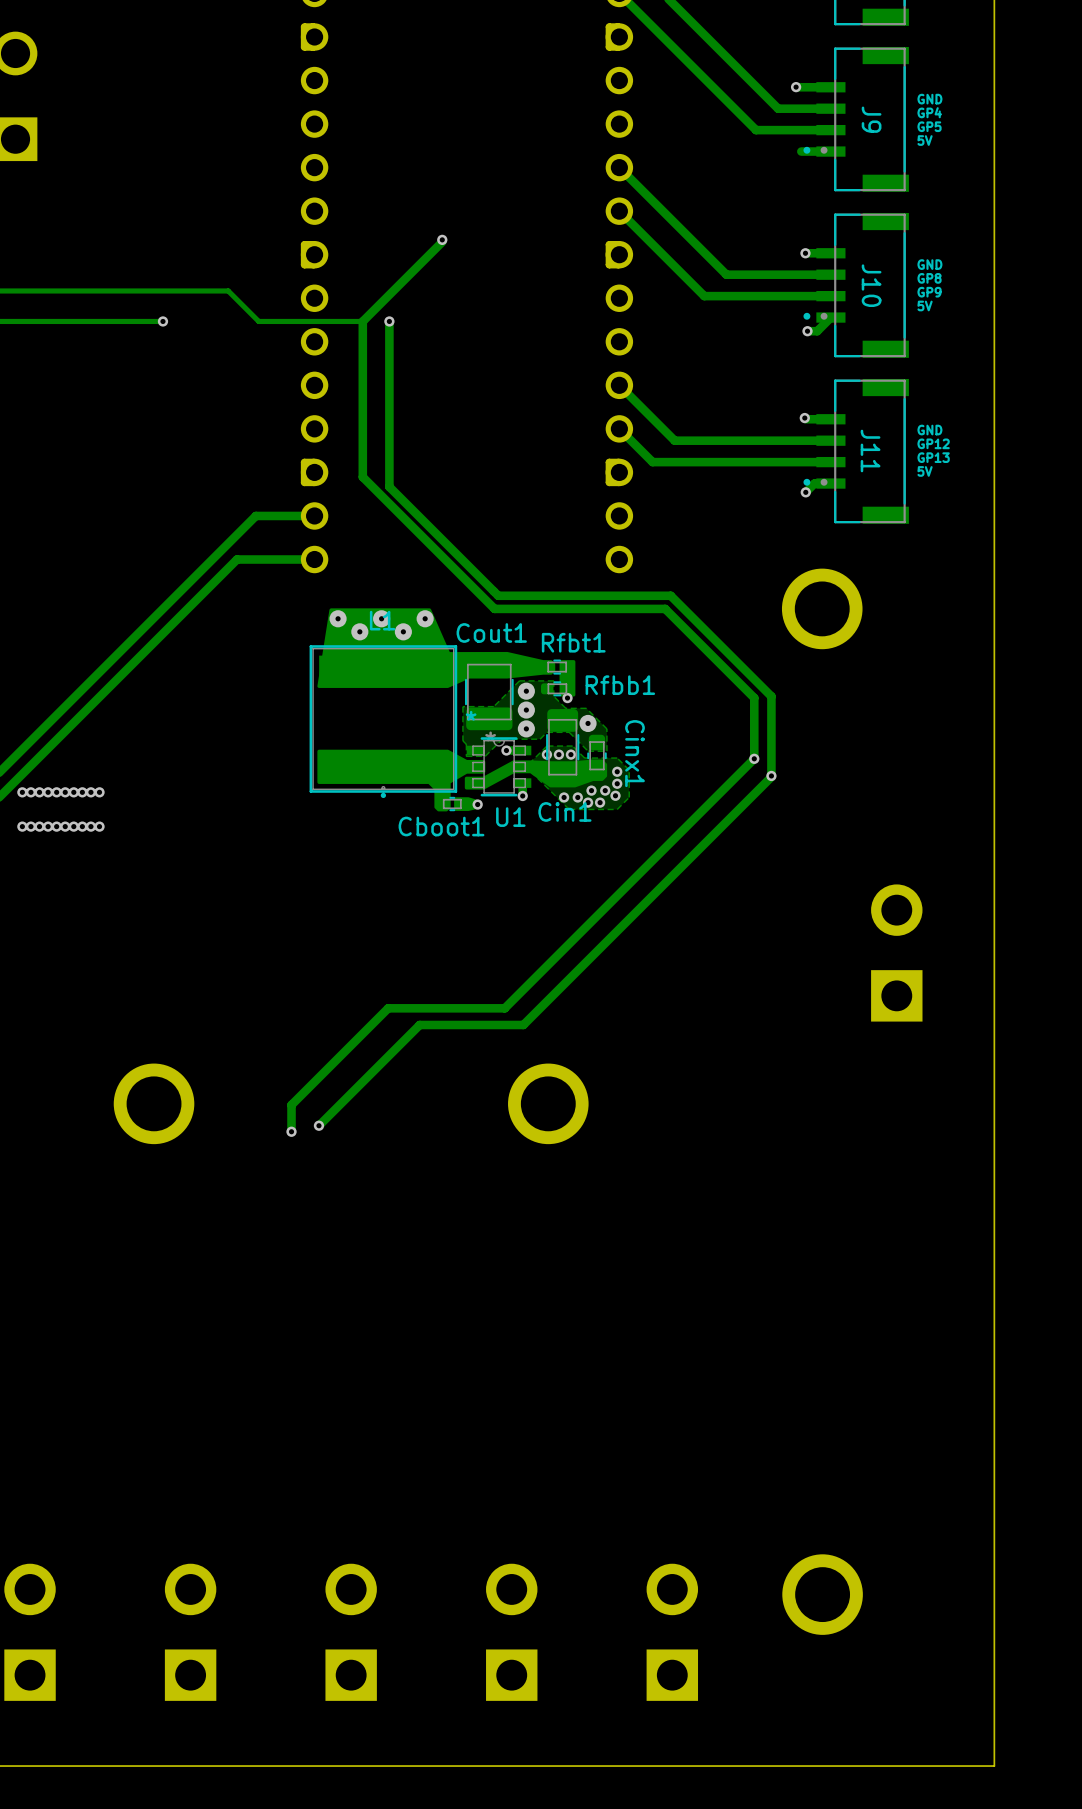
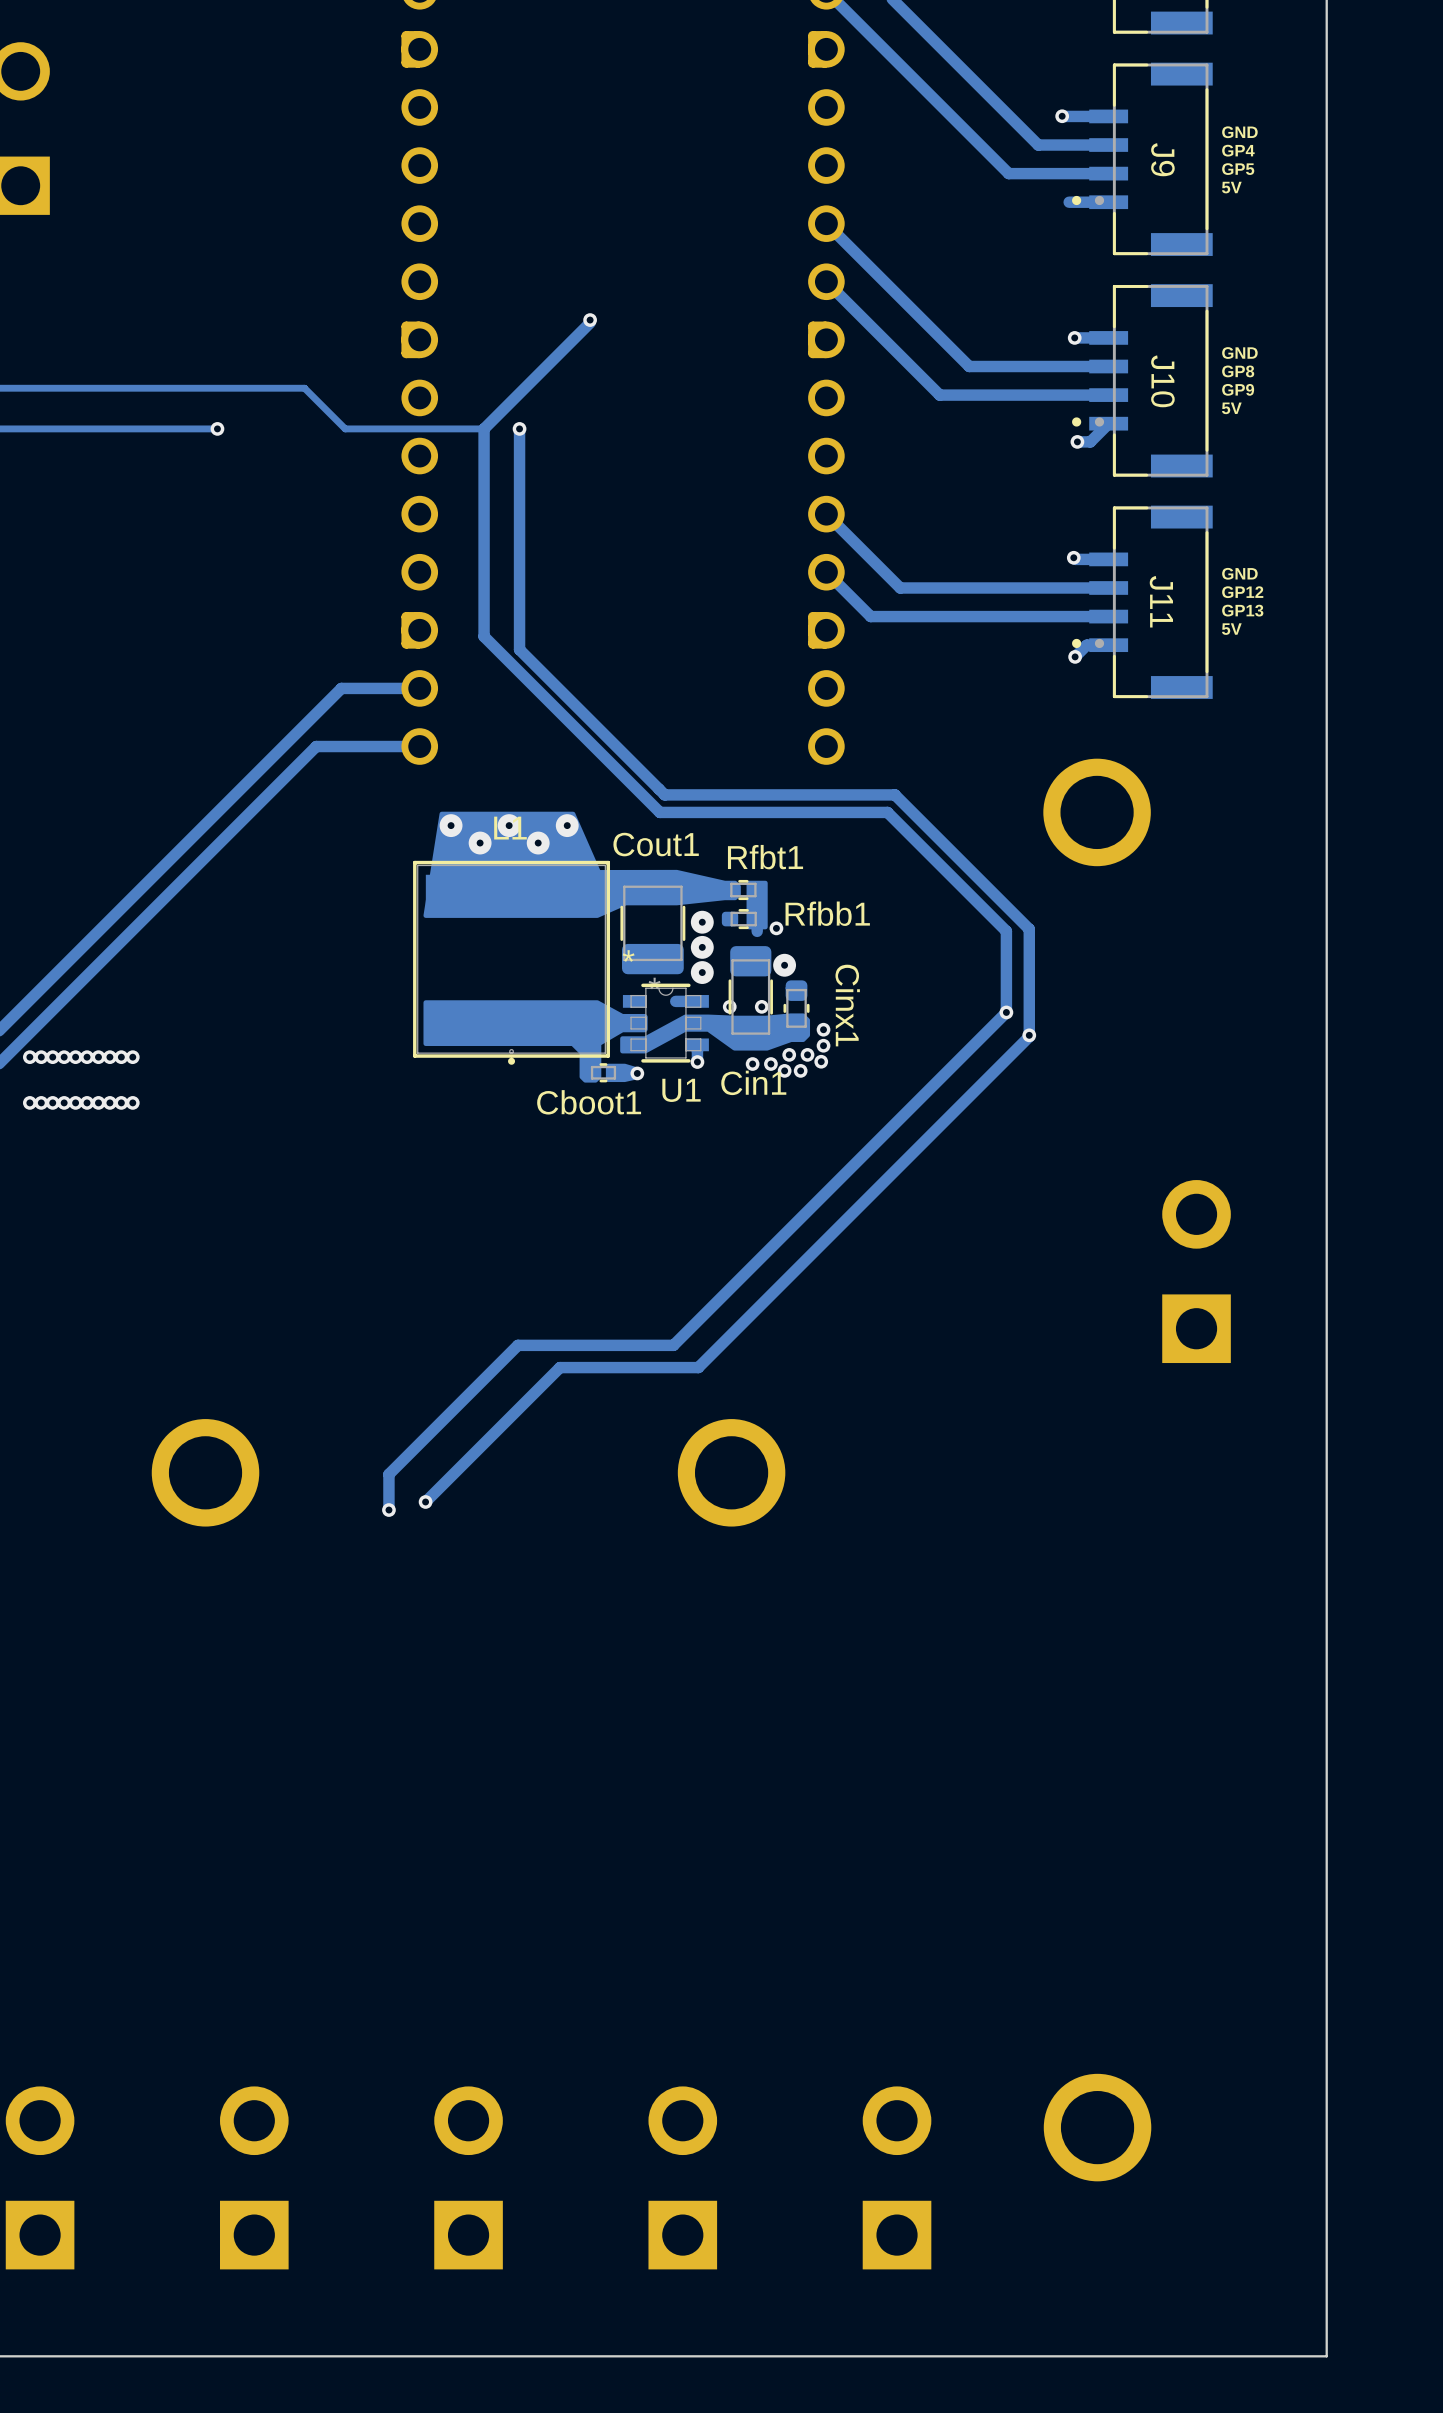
zone outline: (553, 680) (553, 696) (565, 708) (586, 708) (606, 728) (606, 751) (588, 751) (569, 732) (546, 732) (540, 739) (502, 739) (485, 756) (466, 756) (466, 744) (462, 740) (462, 706) (493, 706) (519, 680) (553, 680) -> none
via position: (567, 698) -> (776, 928)
zone outline: (572, 746) (584, 758) (617, 758) (629, 770) (629, 797) (617, 809) (569, 809) (530, 771) (530, 762) (546, 746) (572, 746) -> none
via: (506, 750) -> none
via: (558, 754) -> none

